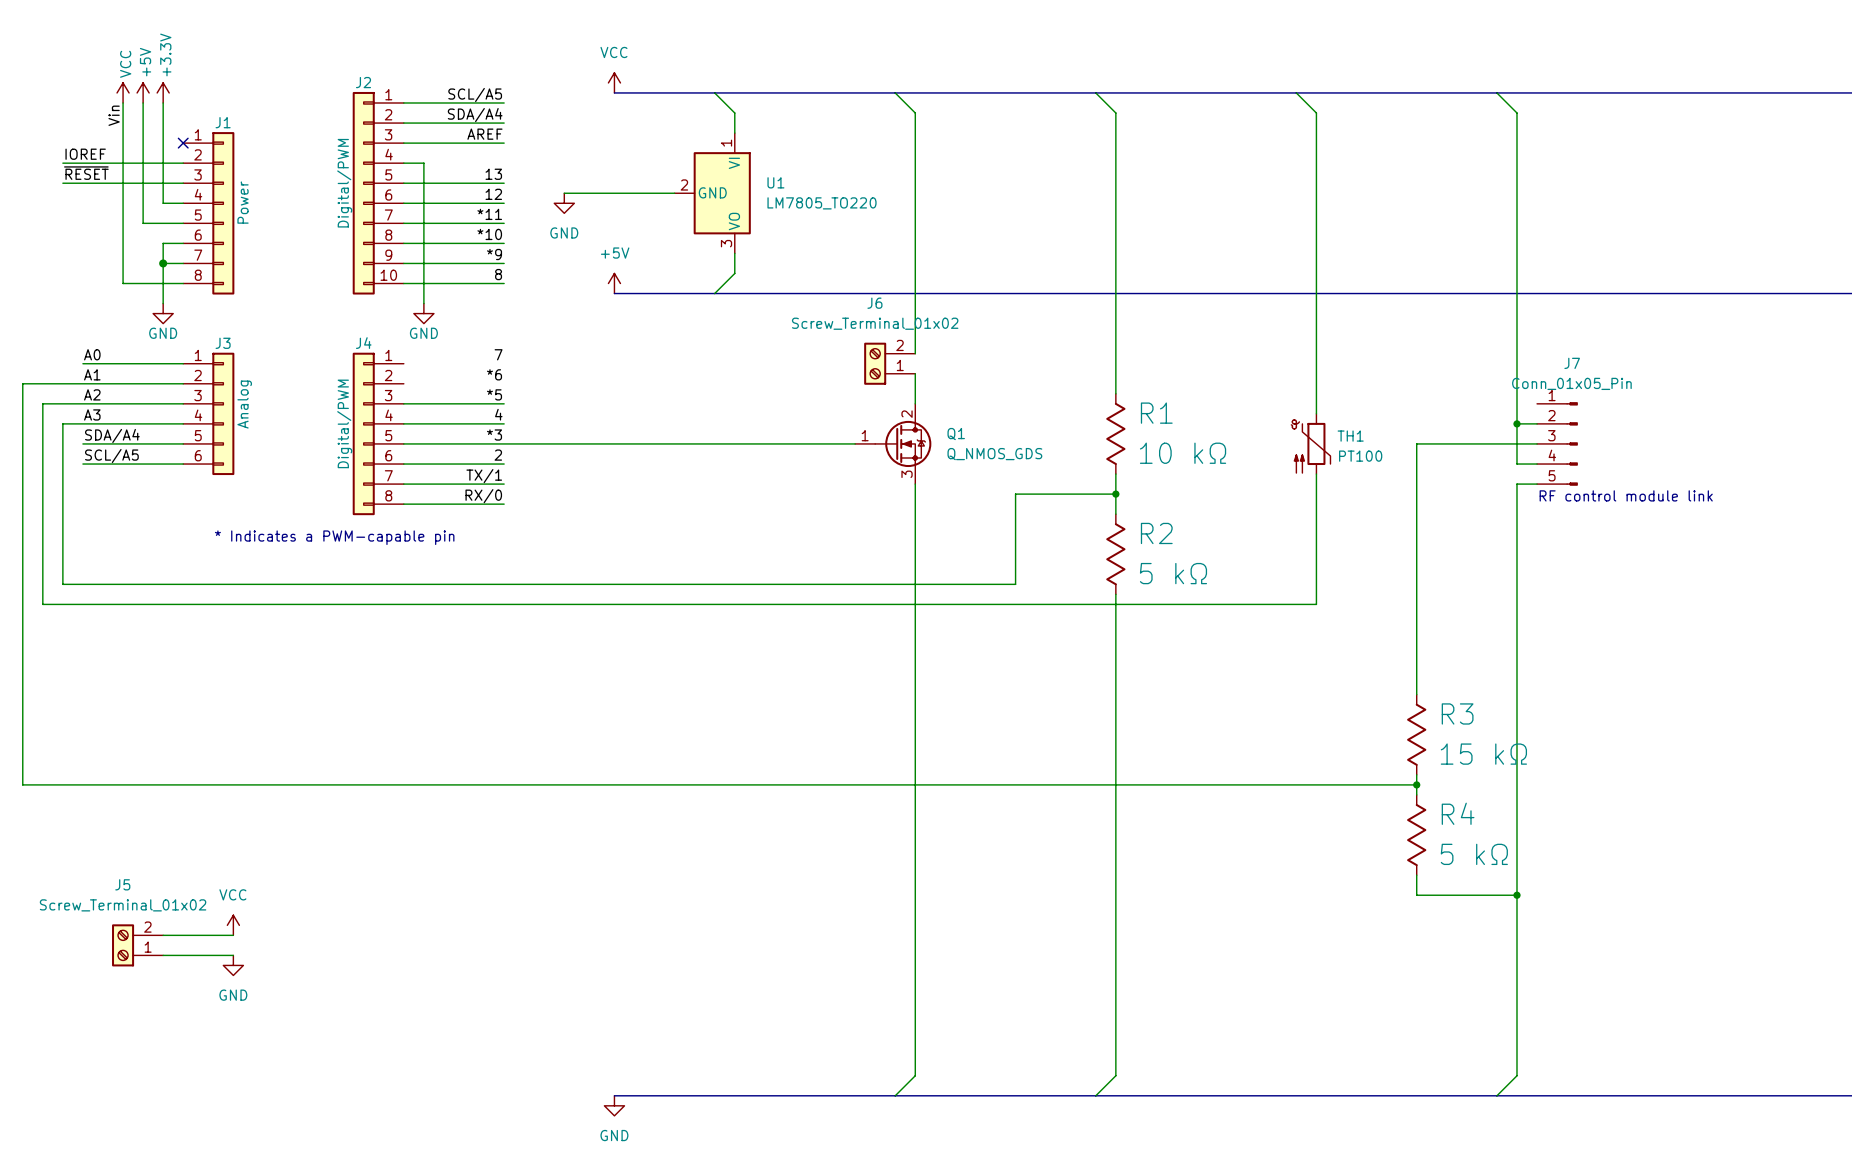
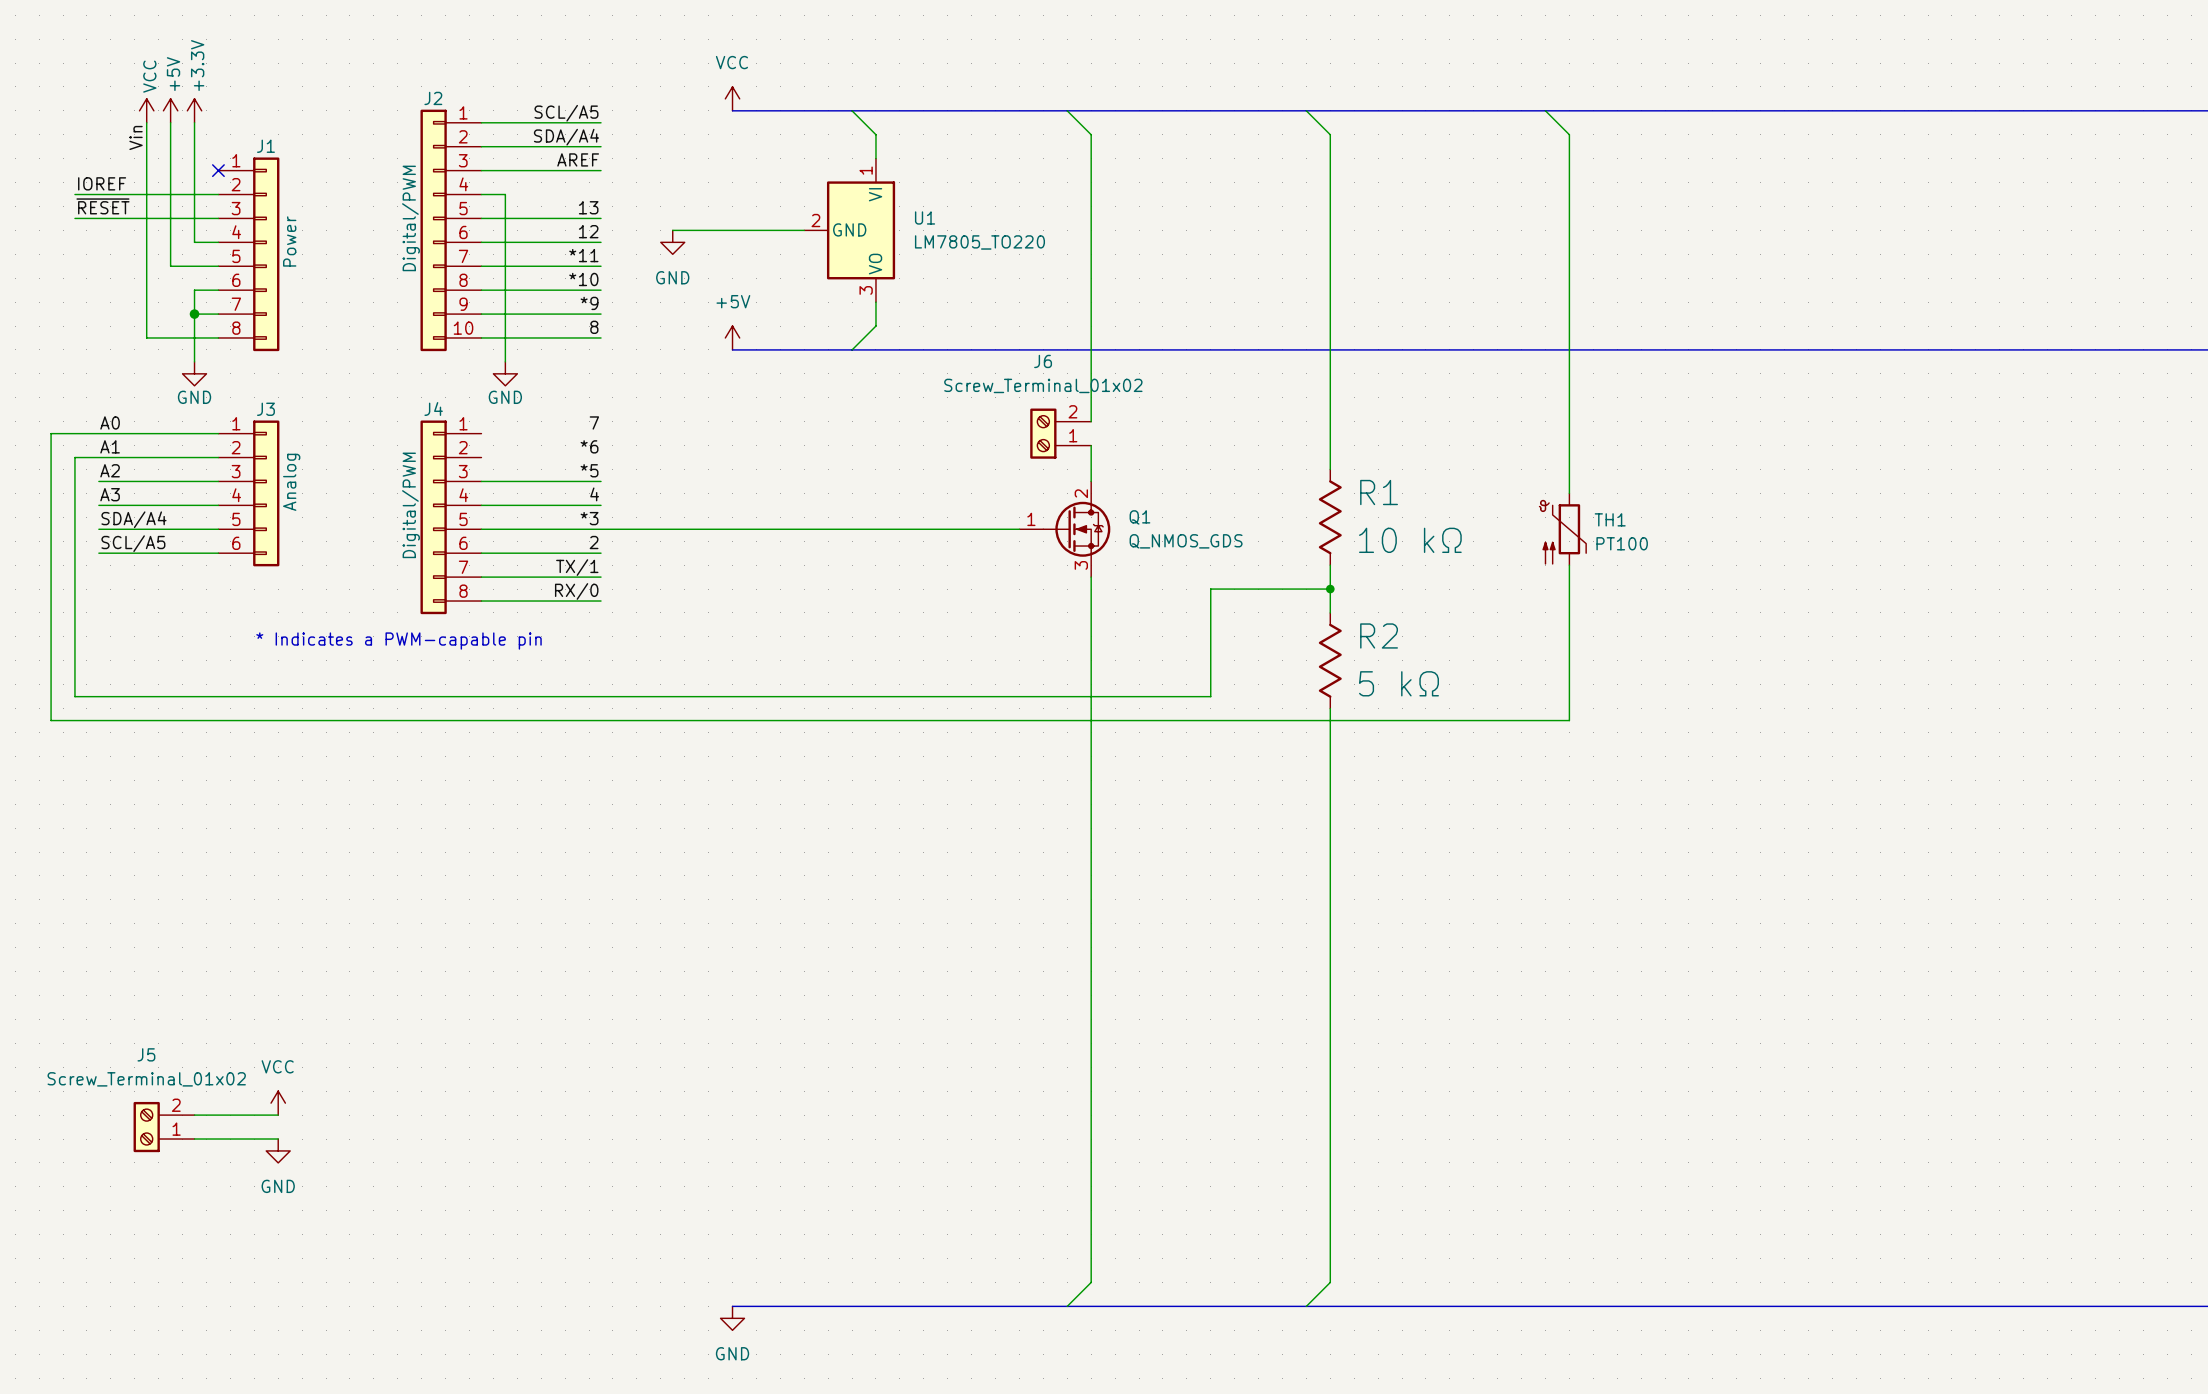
wire: (1496, 92) (1516, 113) (1516, 464) (1537, 464) -> none
wire: (62, 383) (22, 383) (22, 784) (1416, 784) -> none
wire: (42, 403) (82, 403) -> (51, 481) (51, 433) (98, 433)
wire: (62, 423) (82, 423) -> (74, 505) (74, 457)
wire: (1516, 423) (1537, 423) -> none
junction: (1516, 423) -> none
wire: (1537, 443) (1416, 443) (1416, 694) -> none
J7: Conn_01x05_Pin (1557, 443) -> none
wire: (1537, 484) (1516, 484) (1516, 1075) (1496, 1095) -> none
text: RF control module link (1626, 495) -> none
R3: 15 kΩ (1416, 734) -> none
wire: (1416, 774) (1416, 794) -> none
junction: (1416, 784) -> none
R4: 5 kΩ (1416, 835) -> none
wire: (1416, 875) (1416, 895) (1516, 895) -> none
junction: (1516, 895) -> none

